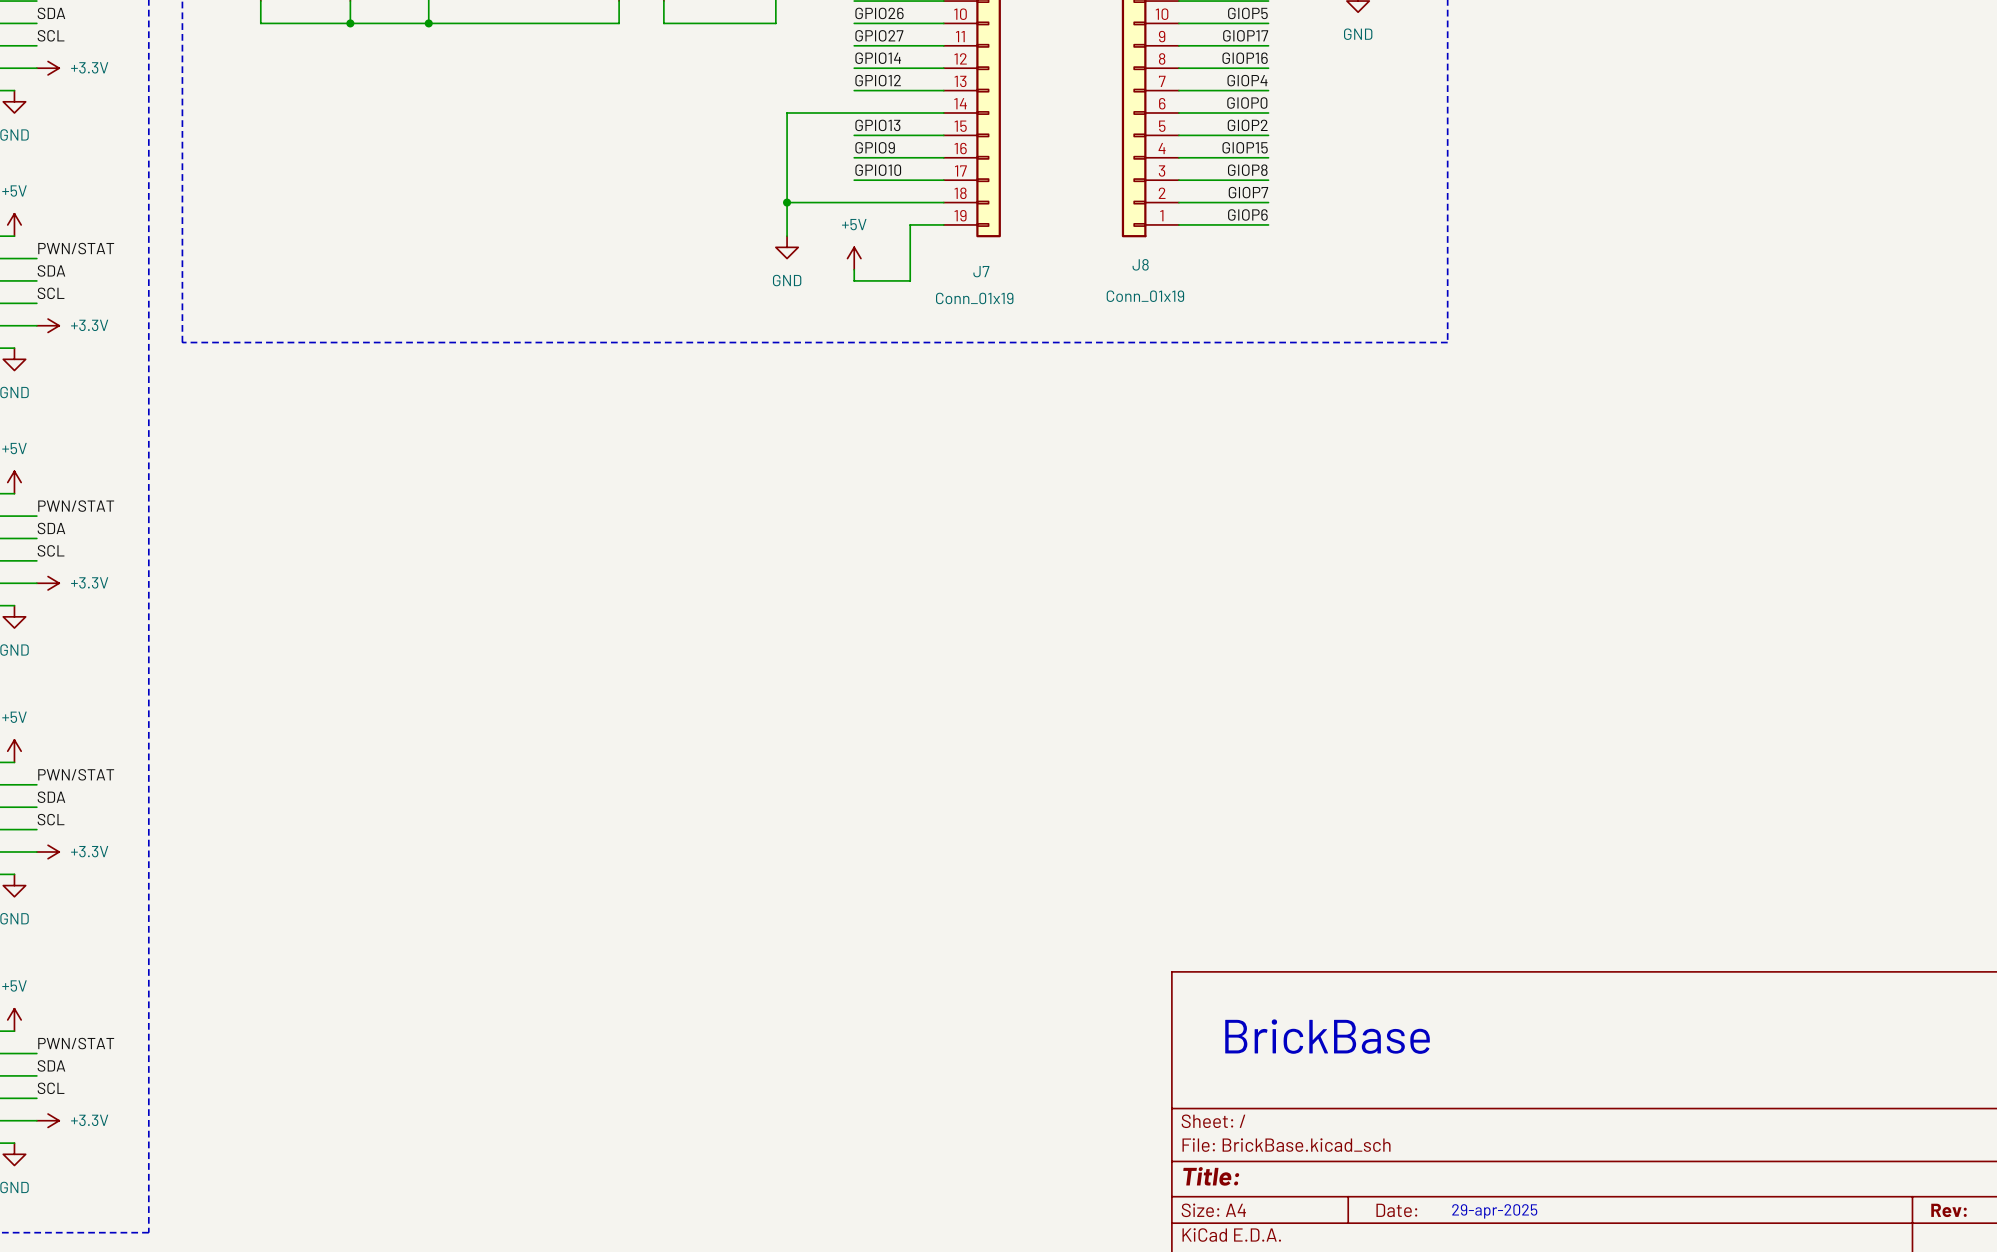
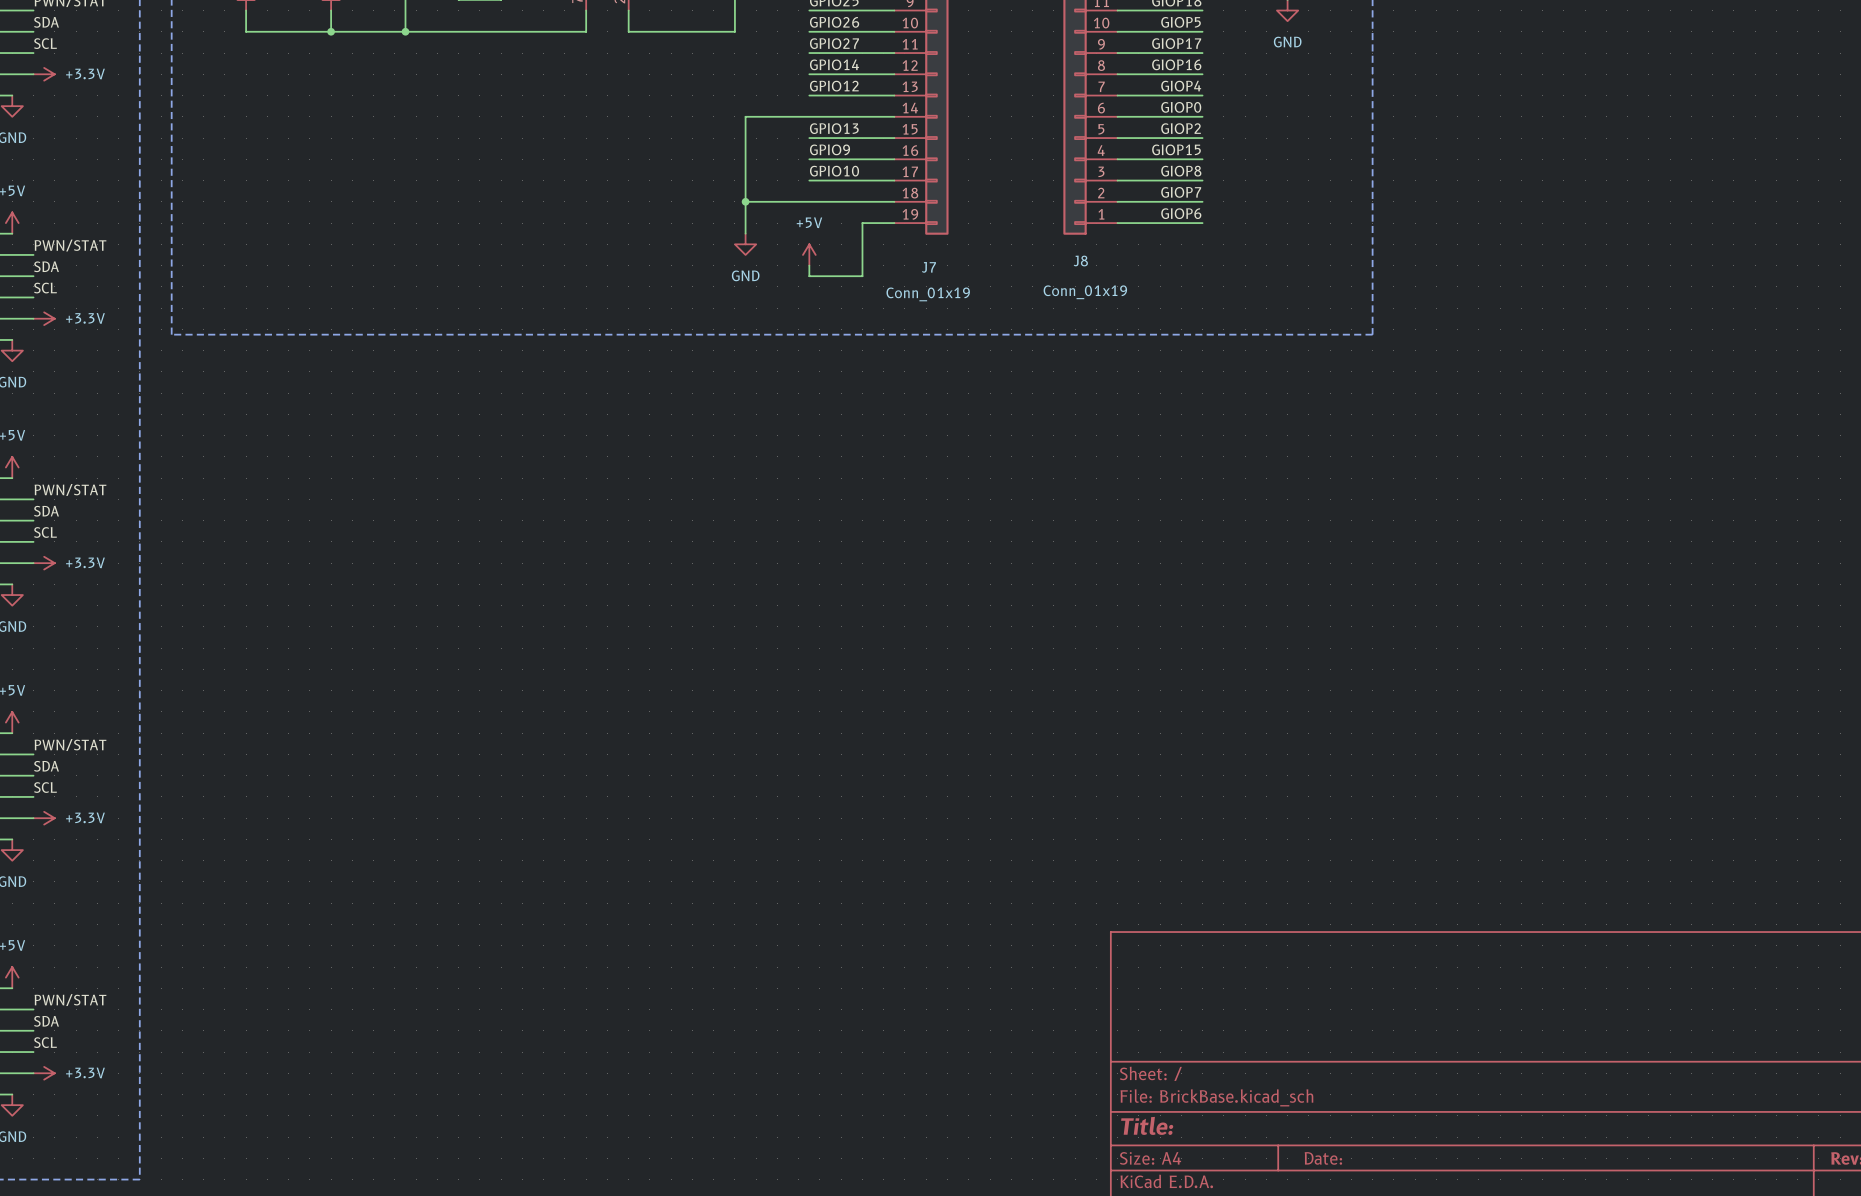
text: BrickBase (1327, 1036) -> none
text: 29-apr-2025 (1494, 1211) -> none

